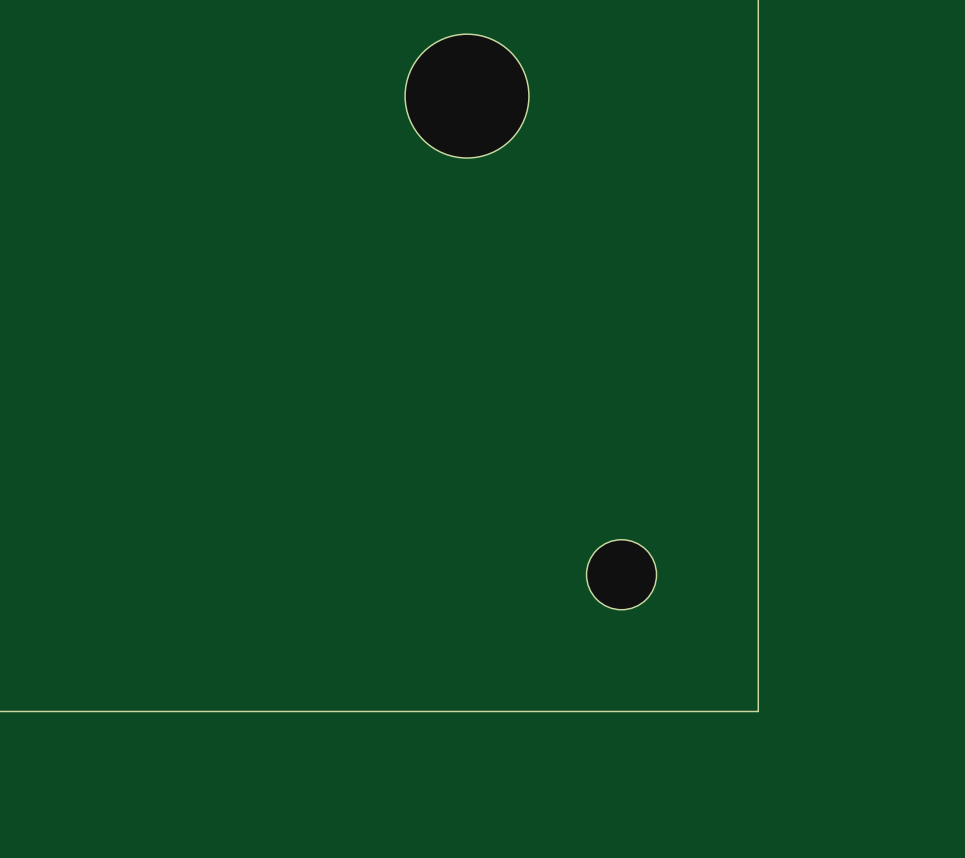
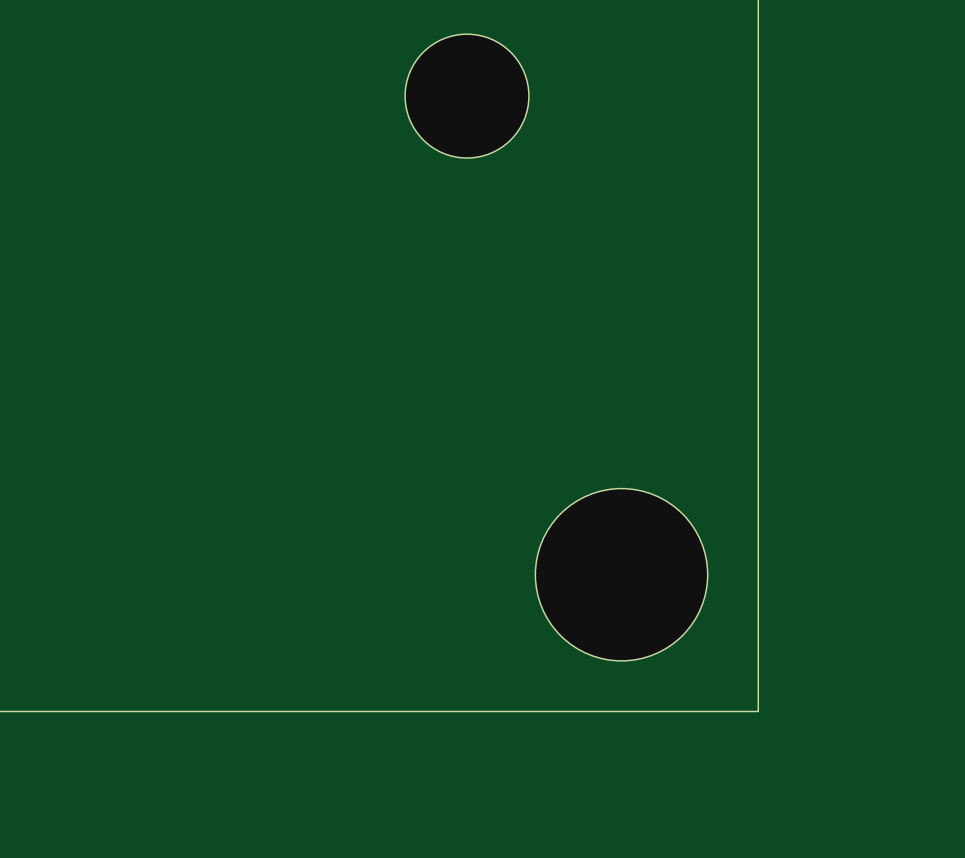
hole size: [586, 539, 657, 610] -> [535, 488, 708, 661]

